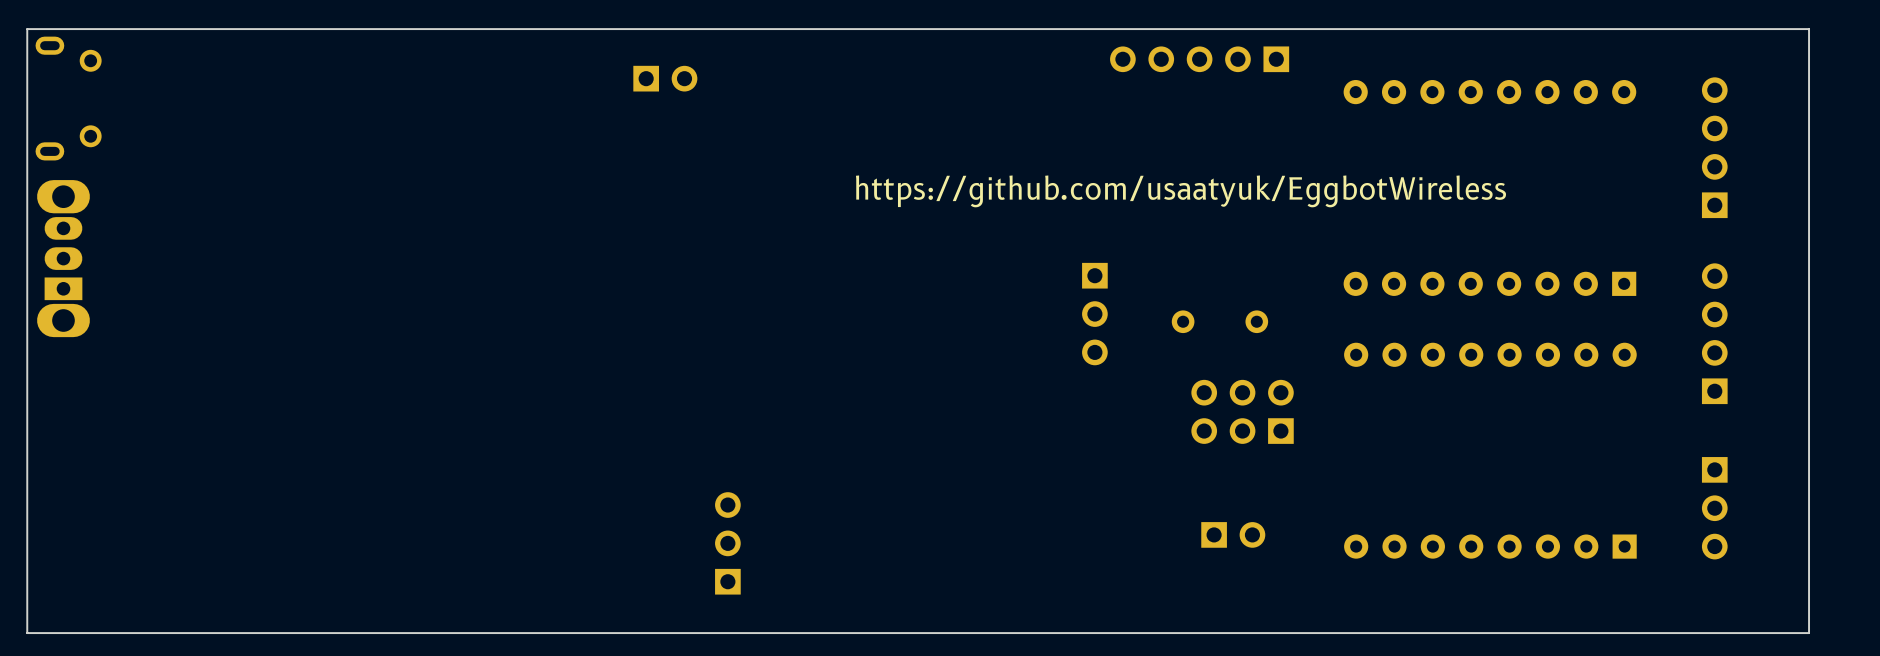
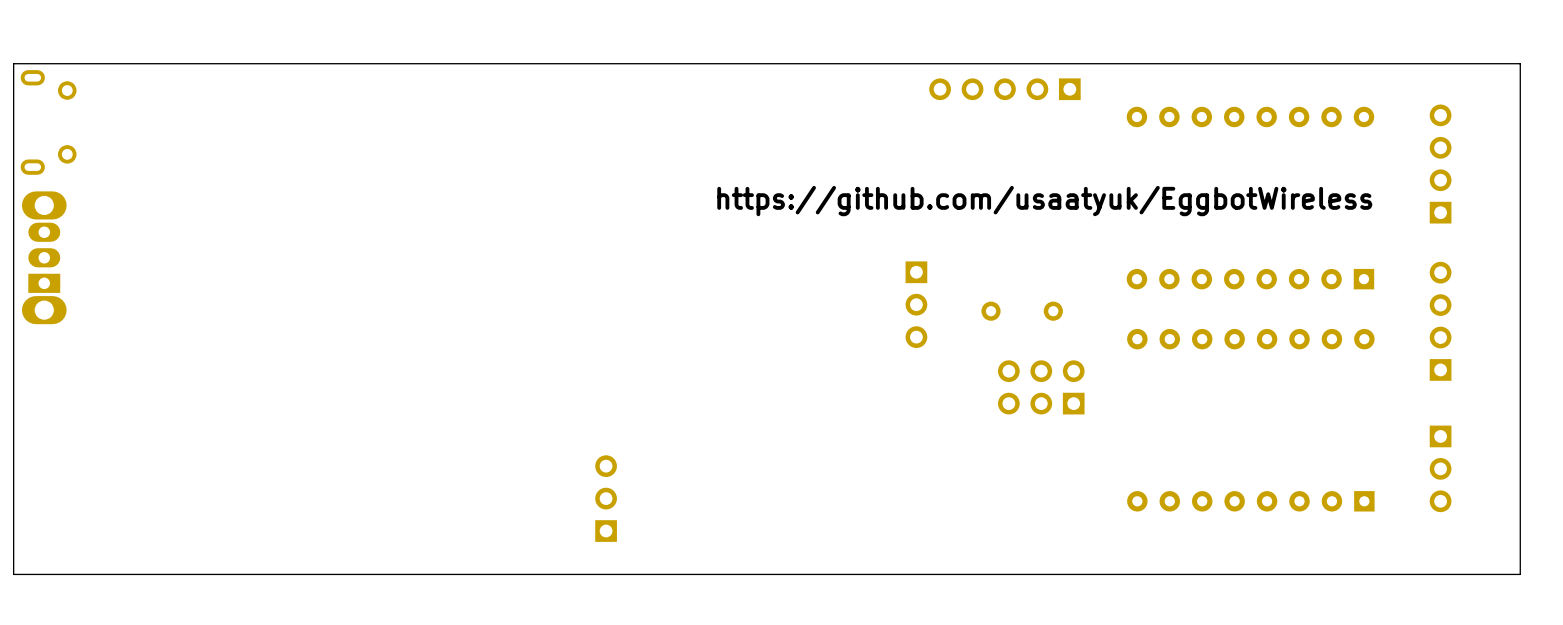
part: (665, 78) -> none
part: (1233, 534) -> none

